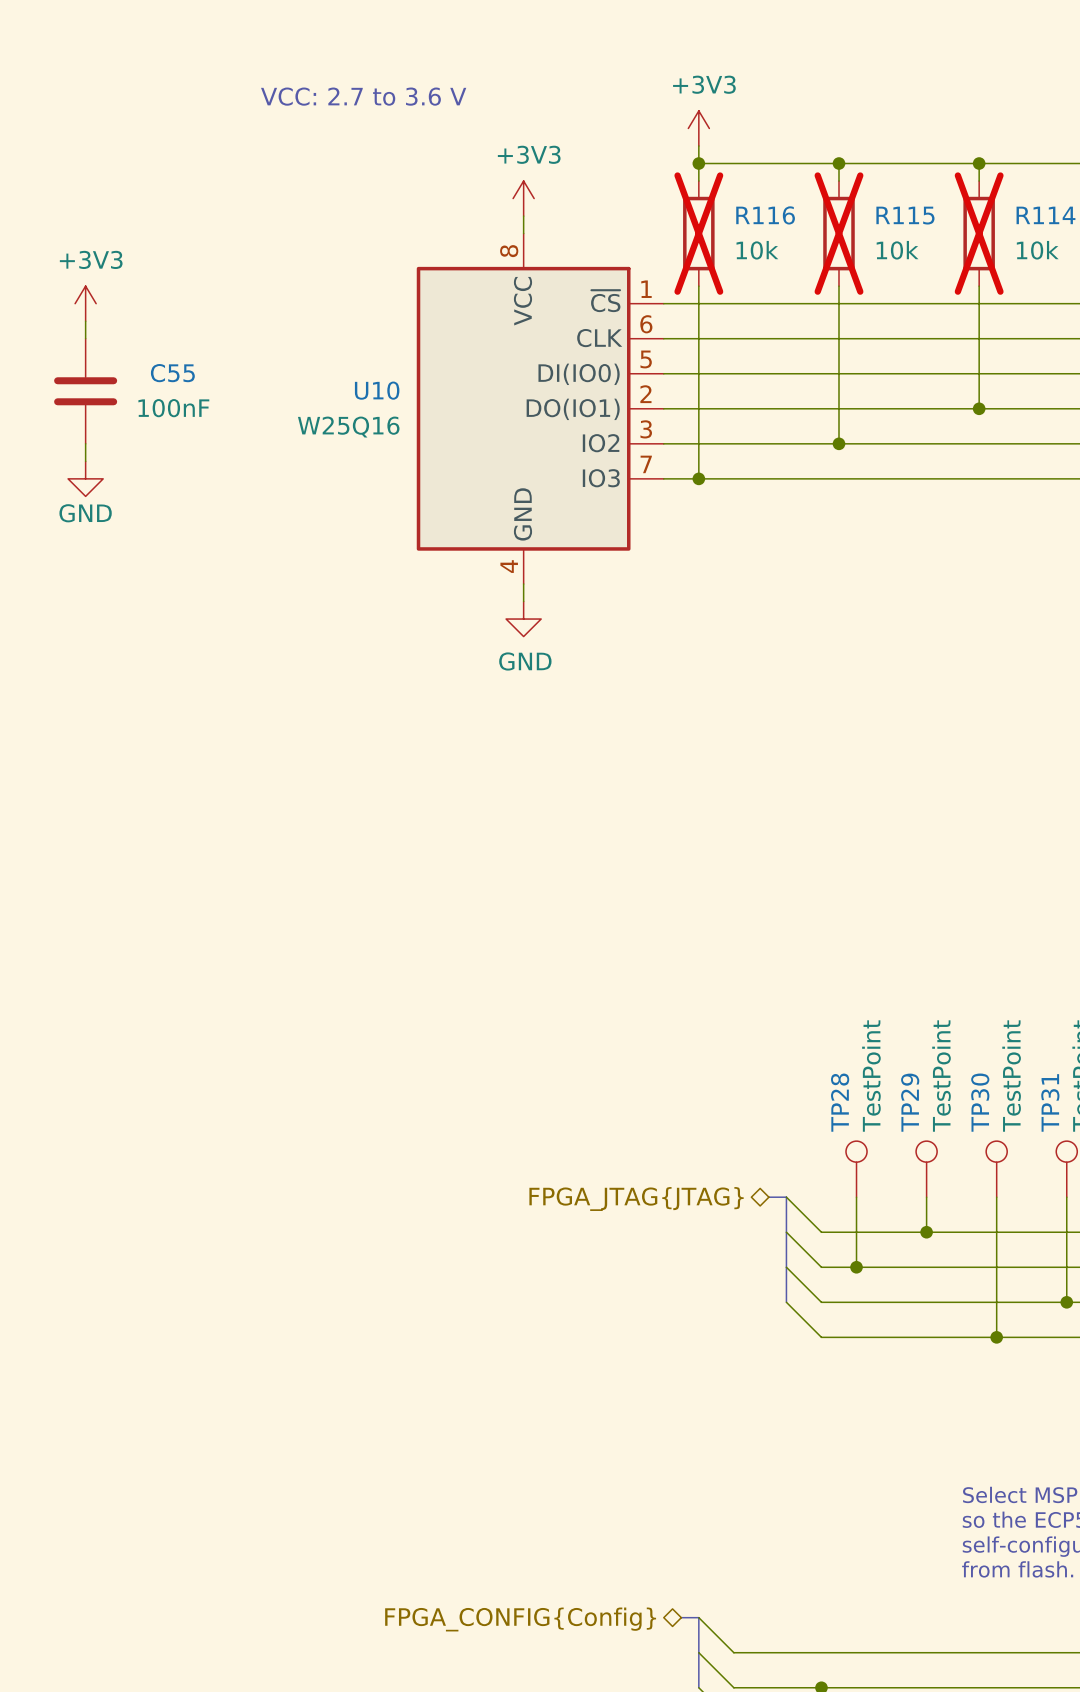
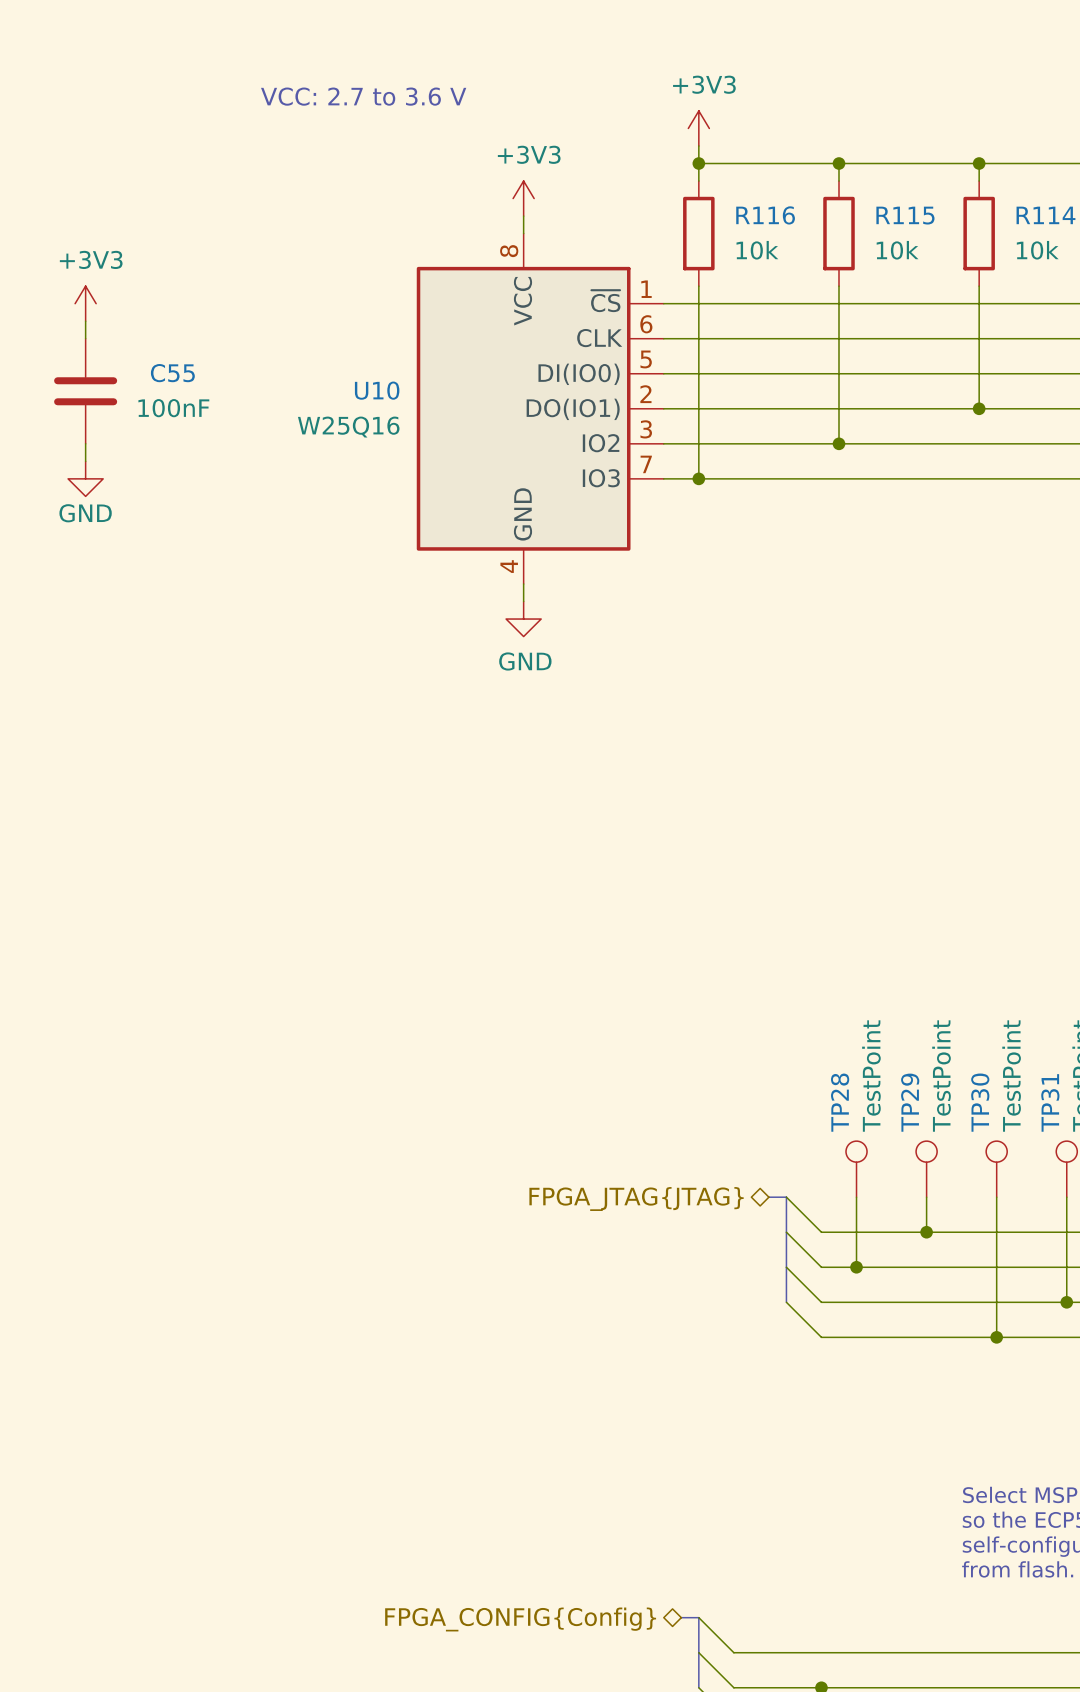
R116 do-not-place cross: (698, 233) -> none
R115 do-not-place cross: (839, 233) -> none
R114 do-not-place cross: (979, 233) -> none

